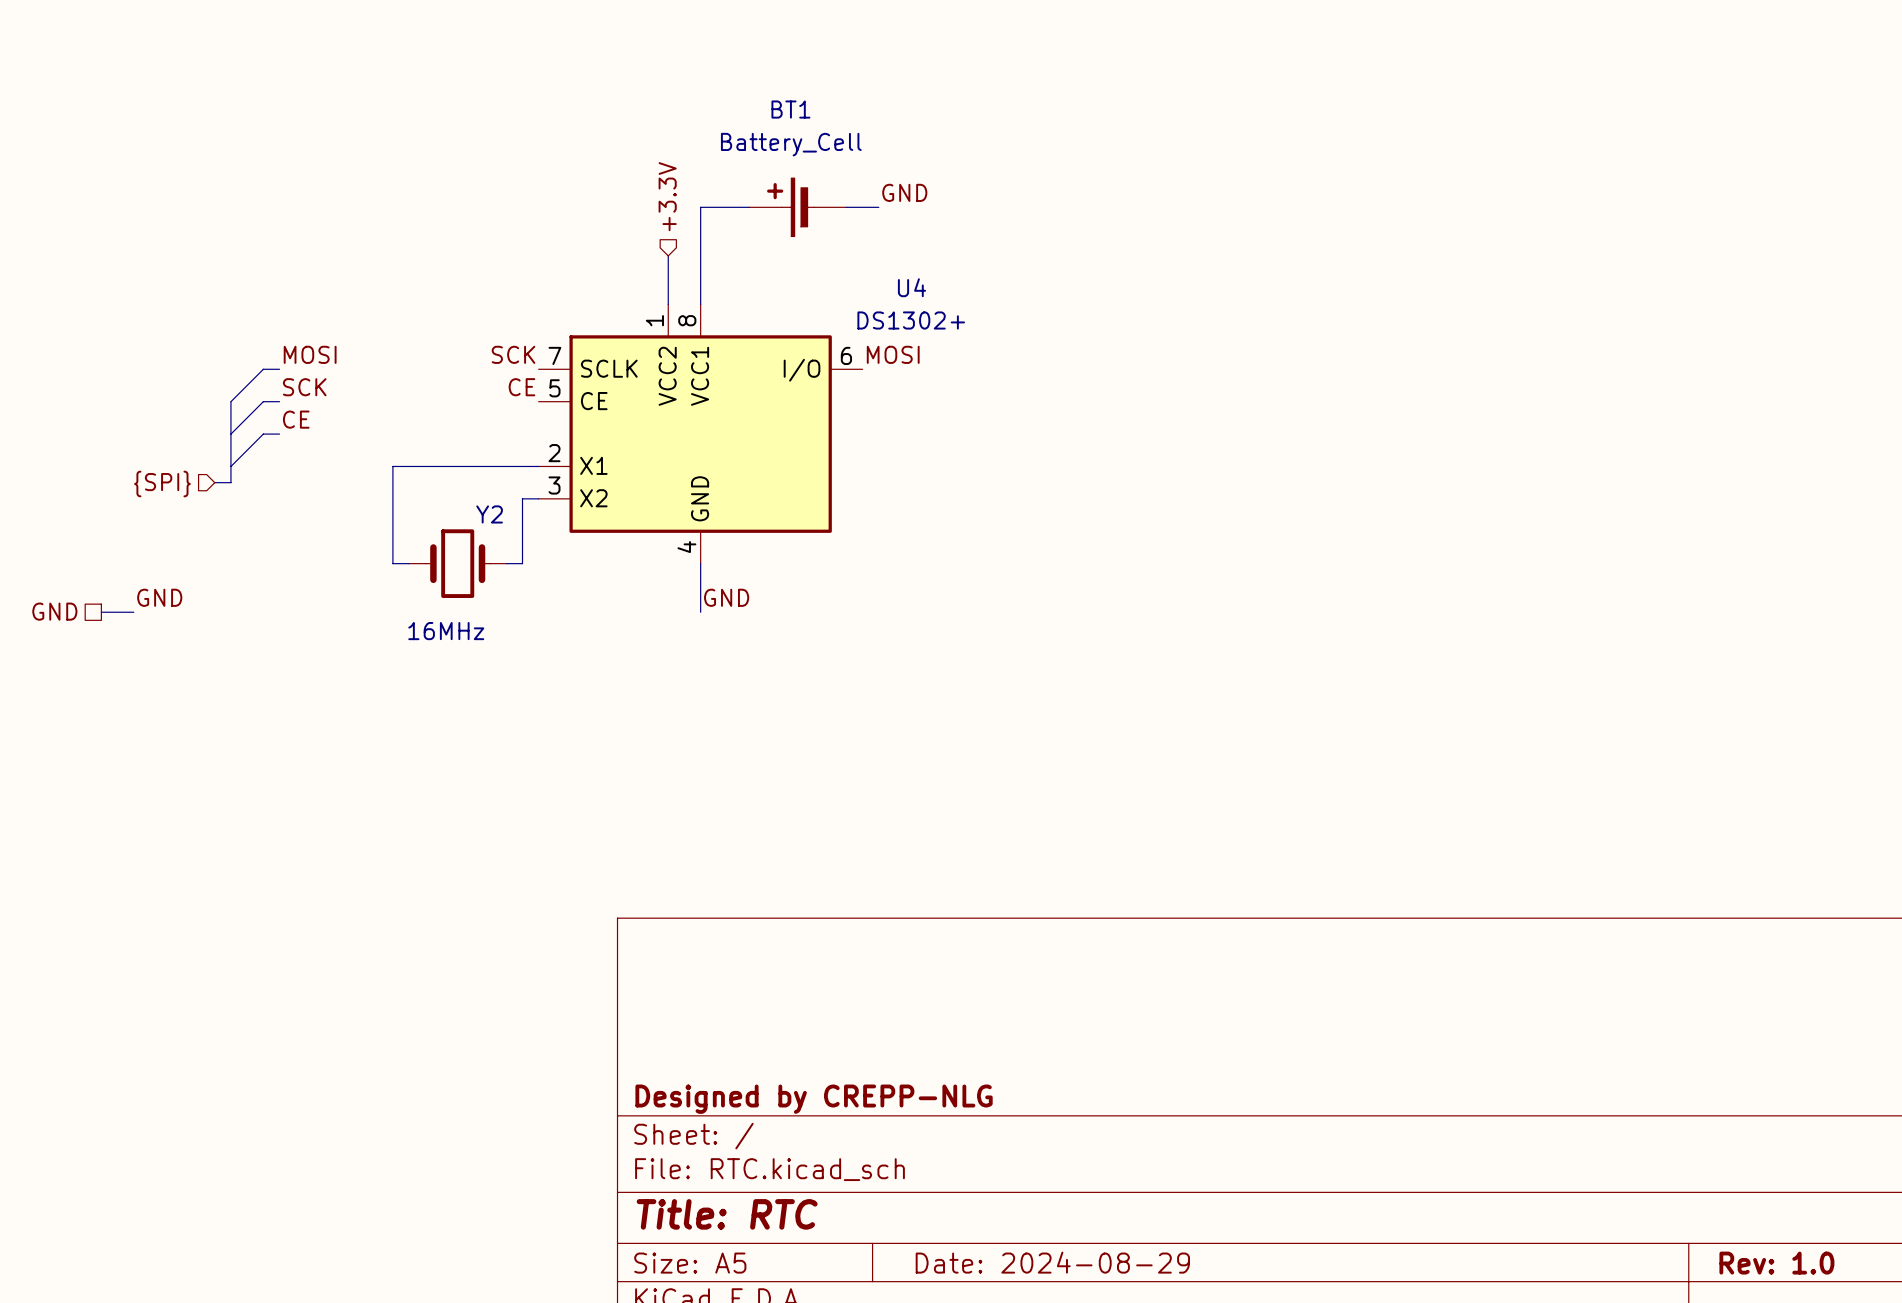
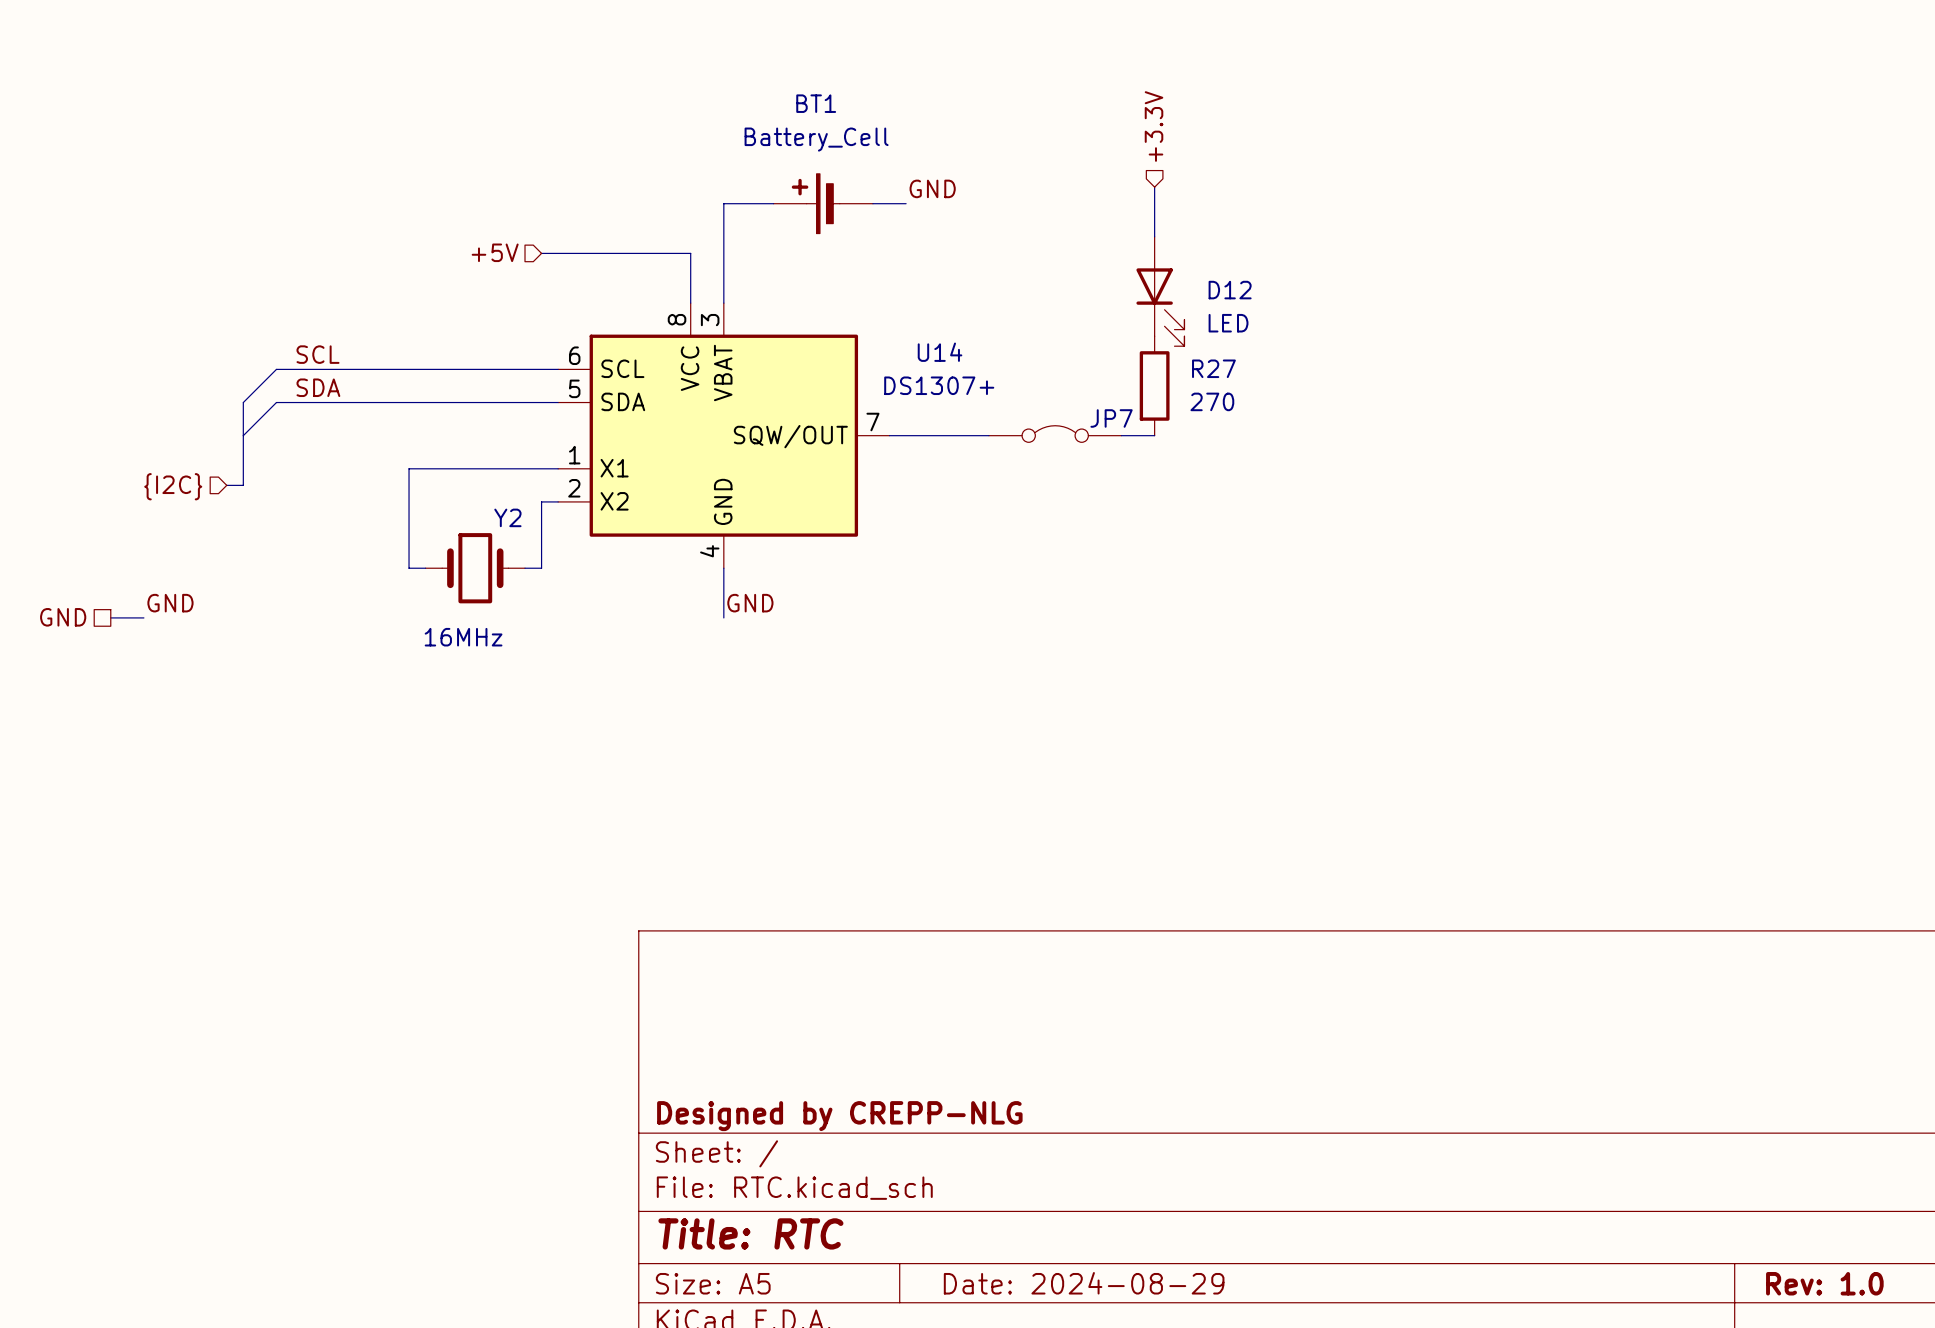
hierarchical label: none -> +3.3V (1154, 126)
wire: none -> (1154, 187) (1154, 236)
hierarchical label: +3.3V (667, 196) -> none
hierarchical label: none -> +5V (495, 252)
wire: none -> (541, 253) (690, 253)
D12: none -> LED (1160, 291)
label: MOSI (310, 354) -> SCL (318, 354)
label: SCK (513, 354) -> none
label: MOSI (893, 354) -> none
wire: none -> (293, 369) (558, 369)
R27: none -> 270 (1154, 385)
label: SCK (304, 387) -> SDA (318, 387)
label: CE (521, 387) -> none
wire: none -> (293, 402) (558, 402)
label: CE (296, 419) -> none
JP7: none -> (1055, 434)
wire: (279, 434) (263, 434) (230, 466) -> none
U4: DS1302+ (700, 434) -> none
U14: none -> DS1307+ (723, 435)
wire: none -> (889, 435) (988, 435)
wire: none -> (1121, 435) (1154, 435)
hierarchical label: {SPI} (162, 483) -> {I2C} (173, 486)

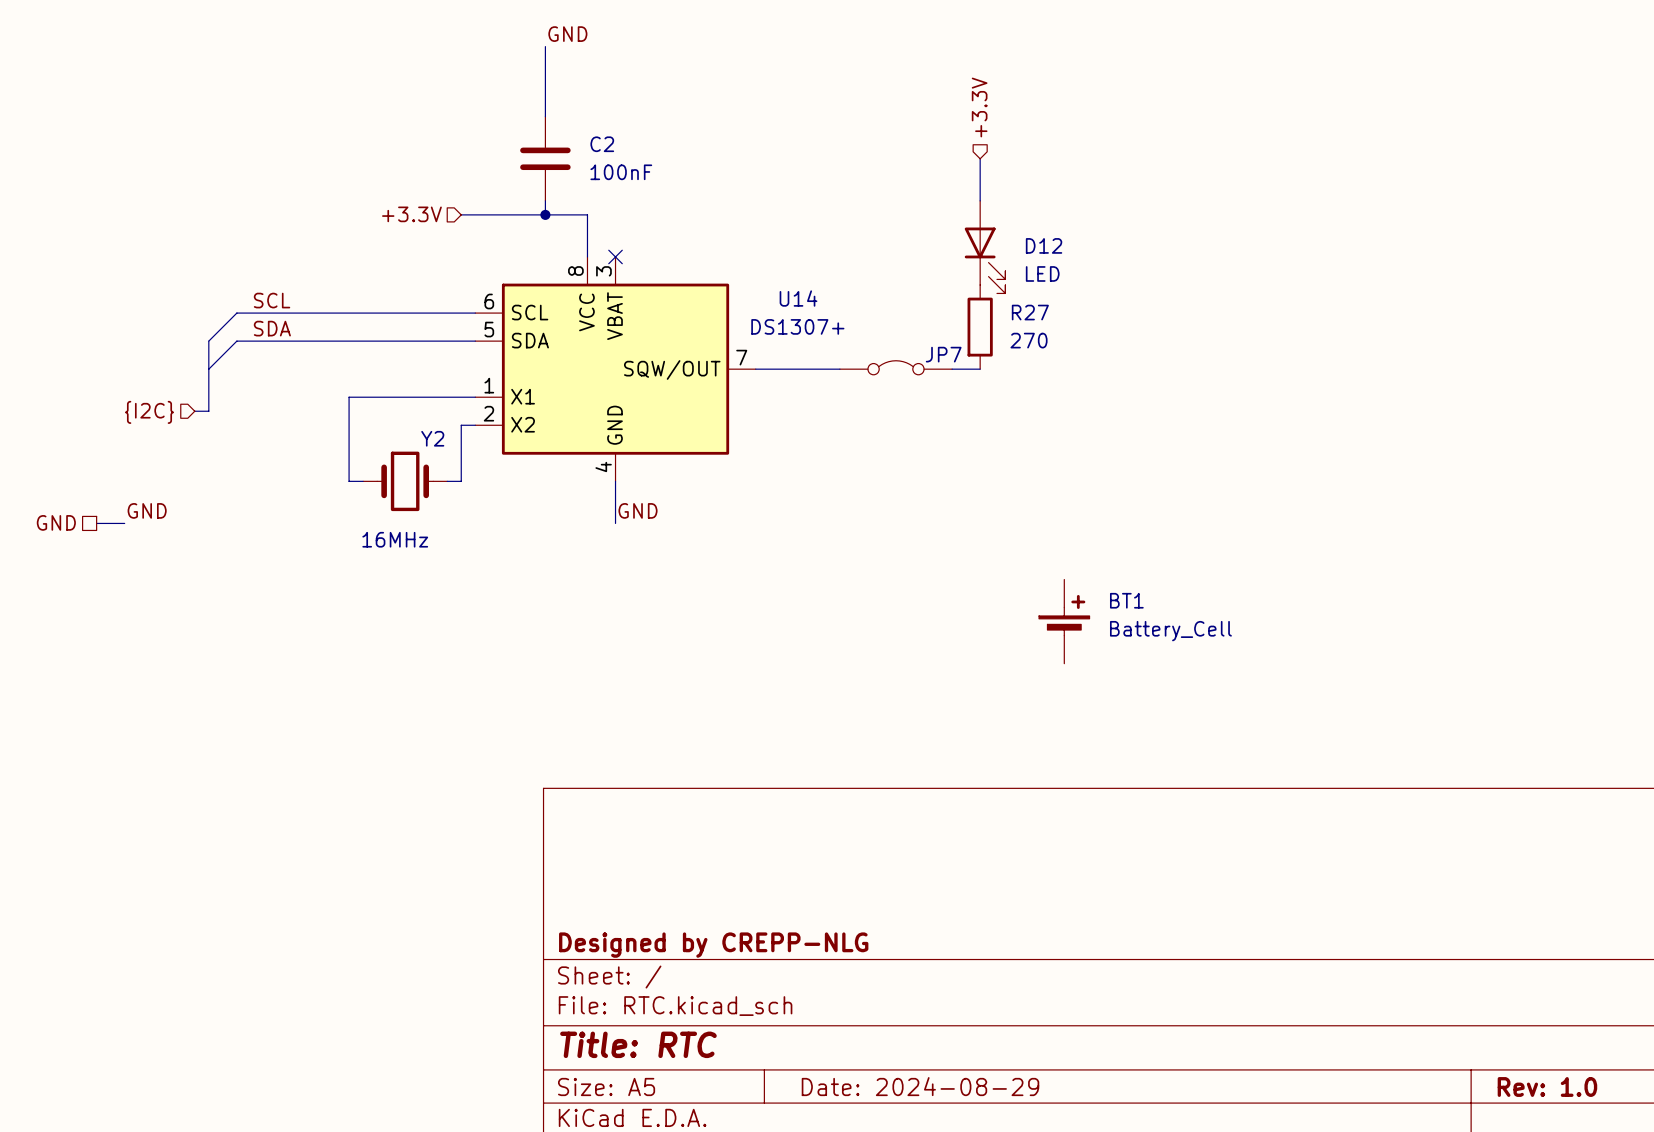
wire: none -> (545, 46) (545, 116)
BT1 name position: BT1 (816, 103) -> BT1 (1126, 600)
BT1 value position: Battery_Cell (816, 139) -> Battery_Cell (1170, 631)
C2: none -> 100nF (545, 158)
label position: GND (932, 188) -> GND (567, 34)
wire: (773, 203) (723, 203) (723, 303) -> none
BT1 rotation: 0° (815, 203) -> 90° clockwise (1064, 615)
BT1 position: (823, 203) -> (1064, 621)
wire: (872, 203) (906, 203) -> none
wire: none -> (545, 200) (545, 214)
hierarchical label: +5V (495, 252) -> +3.3V (411, 214)
junction: none -> (545, 214)
no-connect mark: none -> (615, 256)

